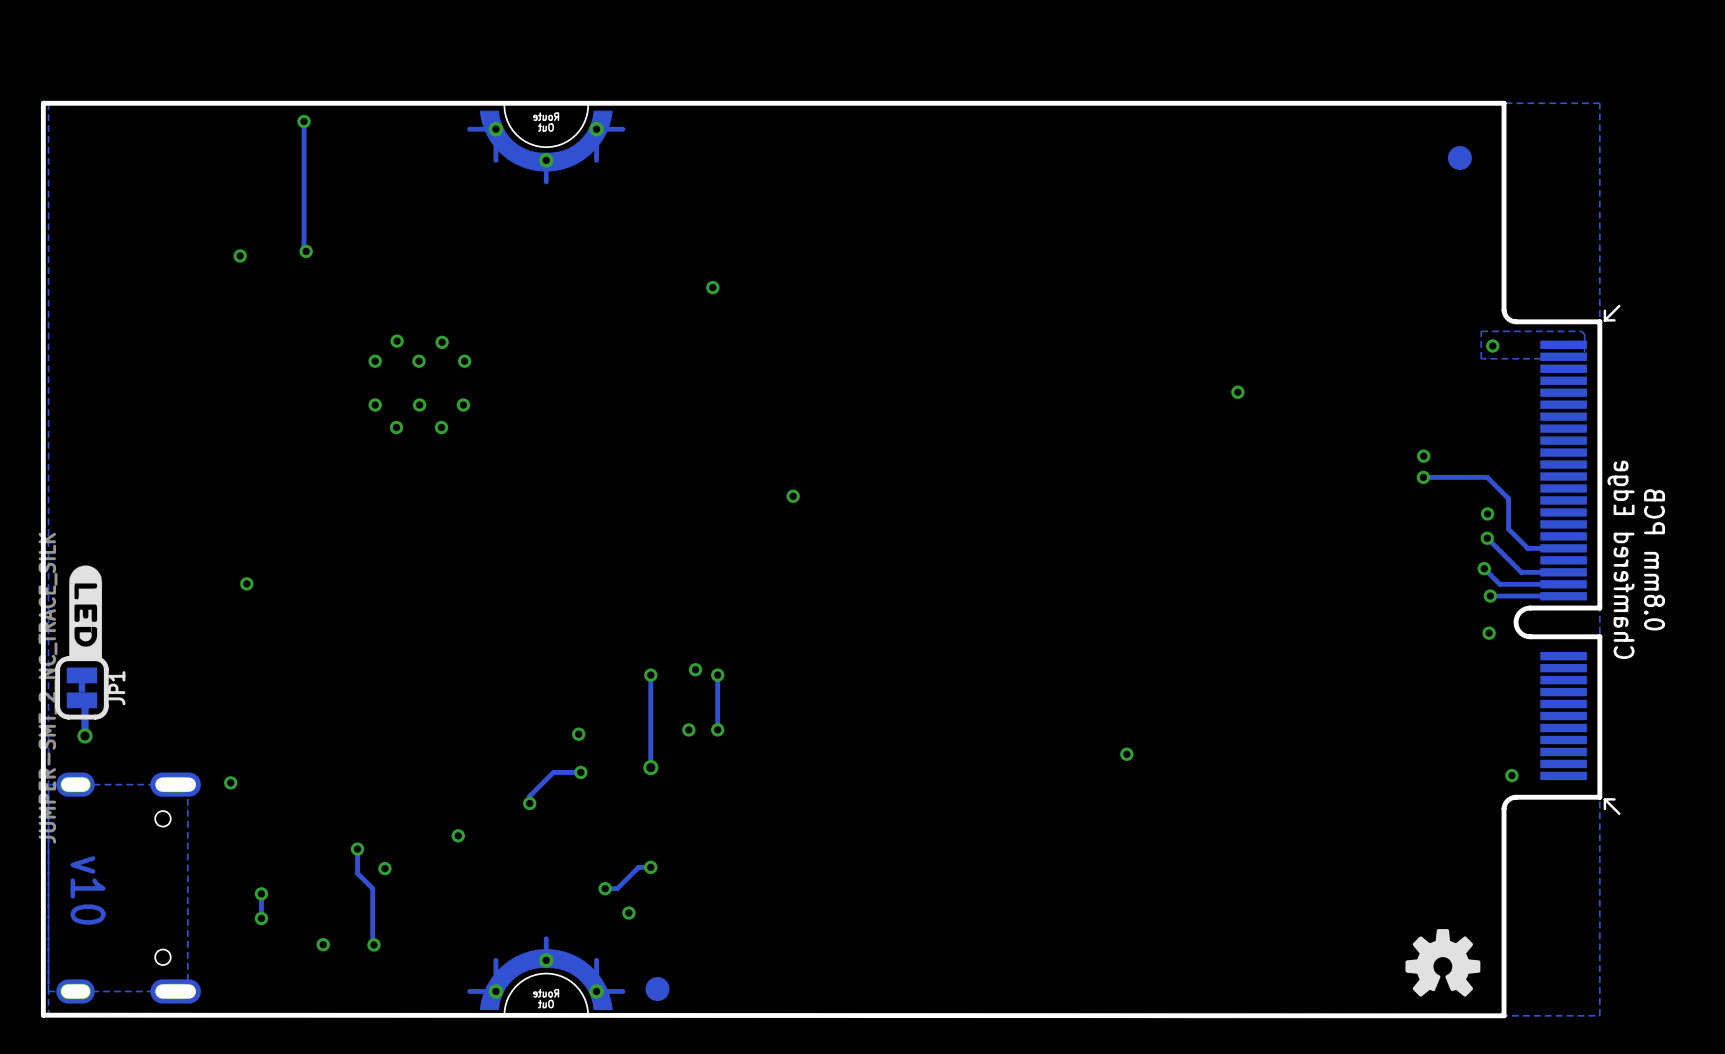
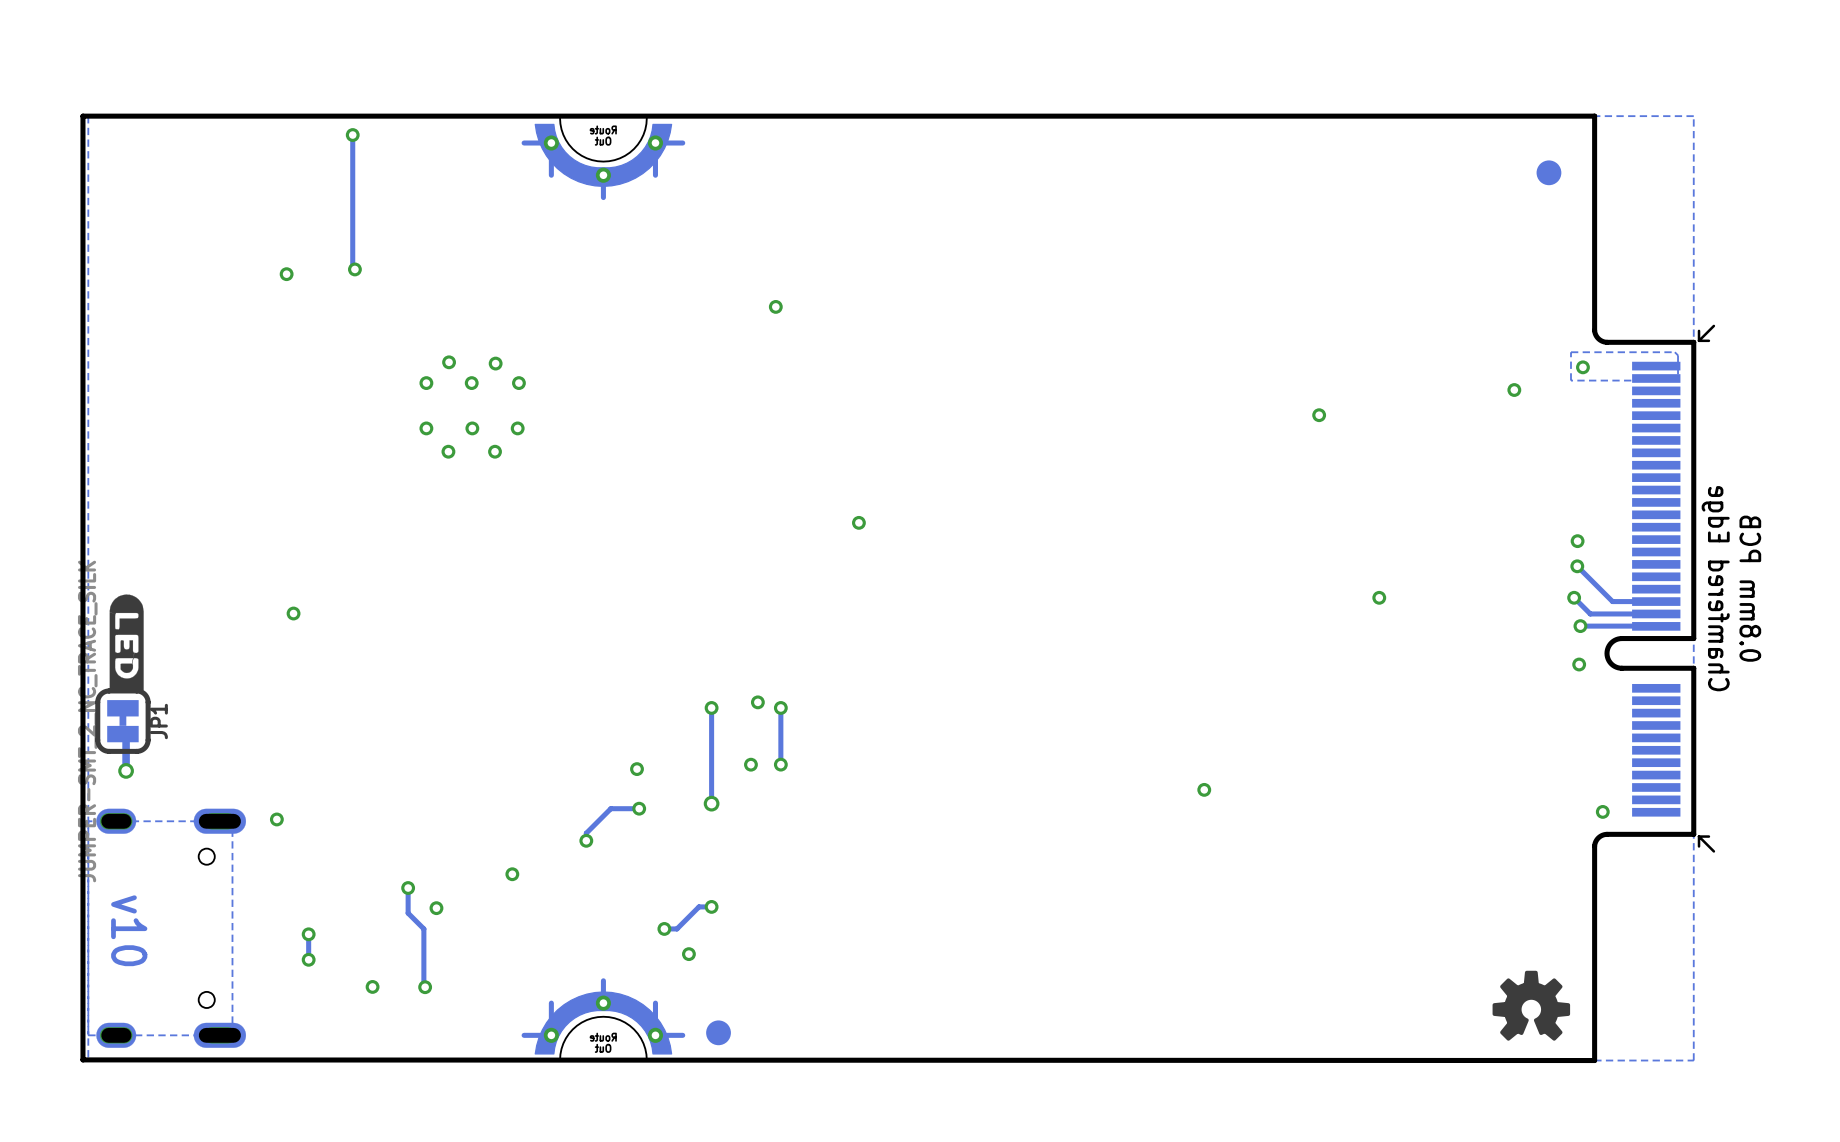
via: none -> (1514, 390)
via: (1423, 456) -> none
track: (1423, 477) (1487, 477) (1508, 498) (1508, 529) (1527, 548) (1563, 548) -> none
via: (1423, 477) -> none
via: none -> (1379, 597)

